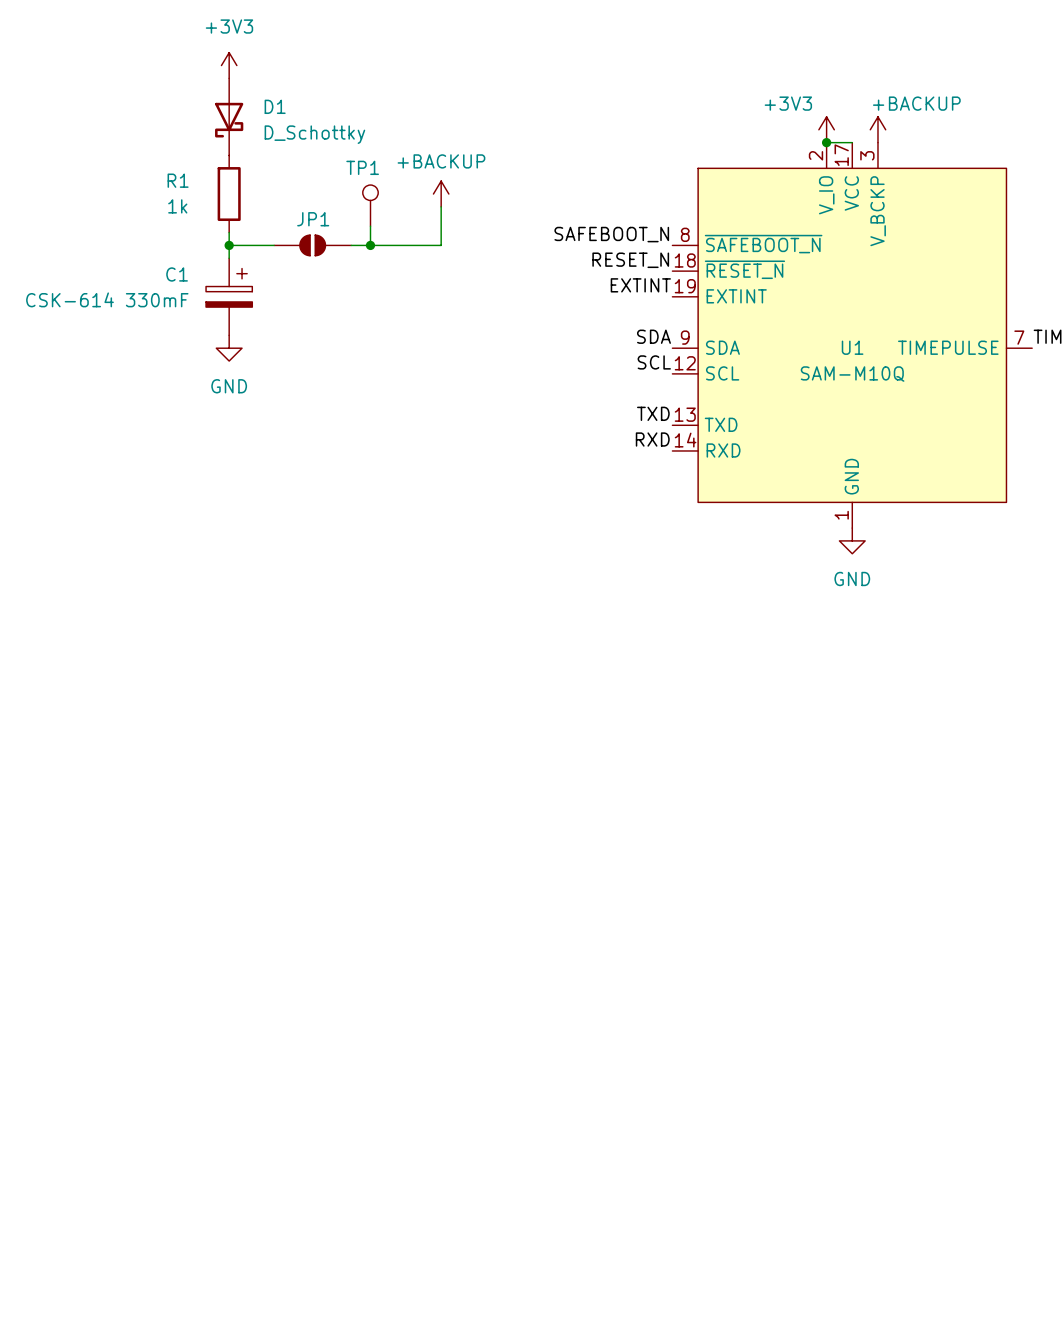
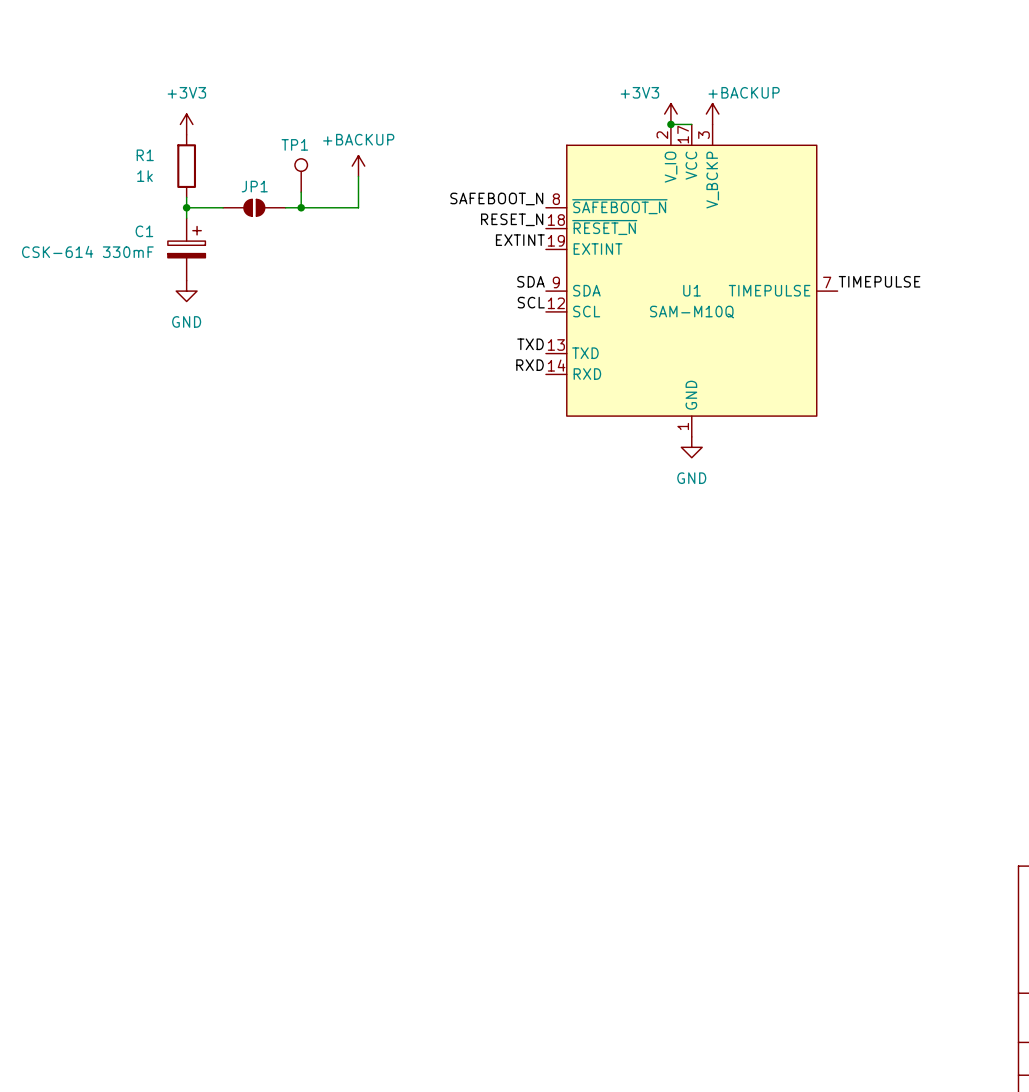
power symbol position: +3V3 (229, 65) -> +3V3 (186, 124)
D1: D_Schottky (229, 116) -> none

